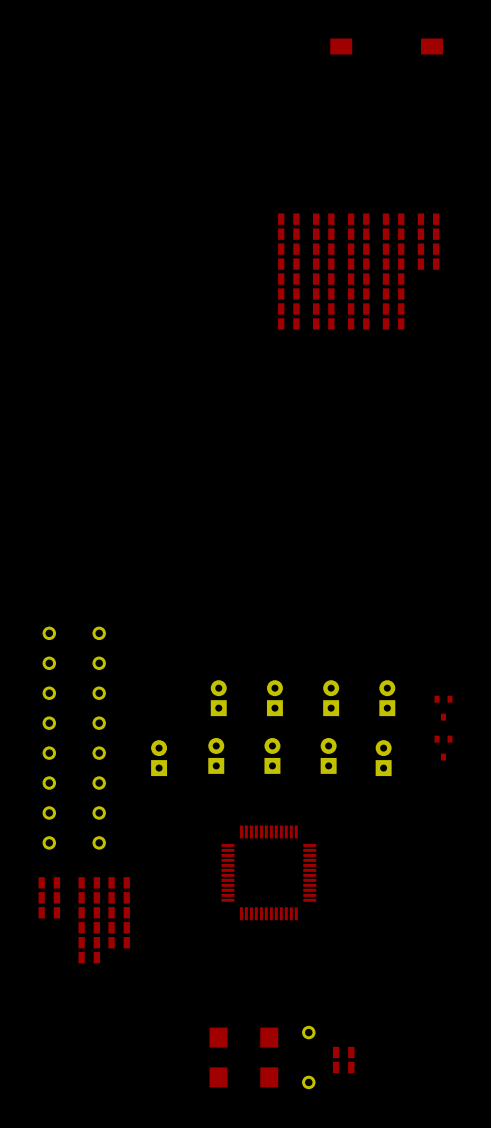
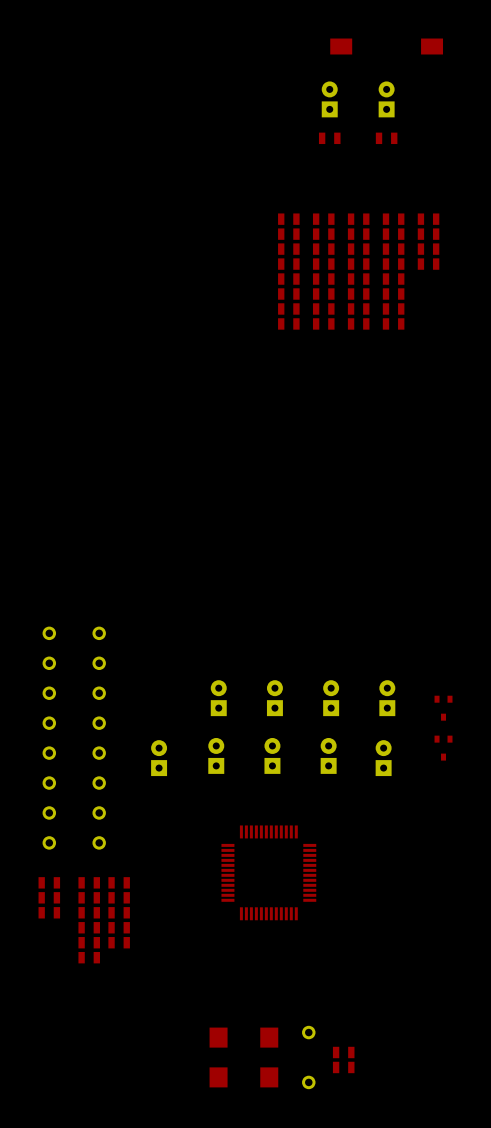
part: none -> (329, 99)
part: none -> (386, 99)
part: none -> (329, 138)
part: none -> (386, 138)

